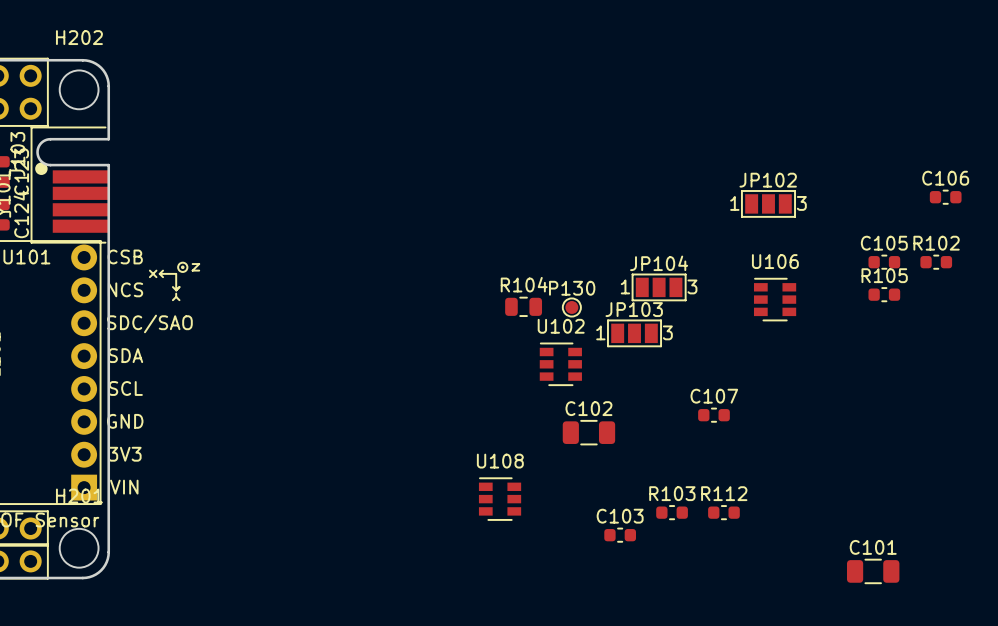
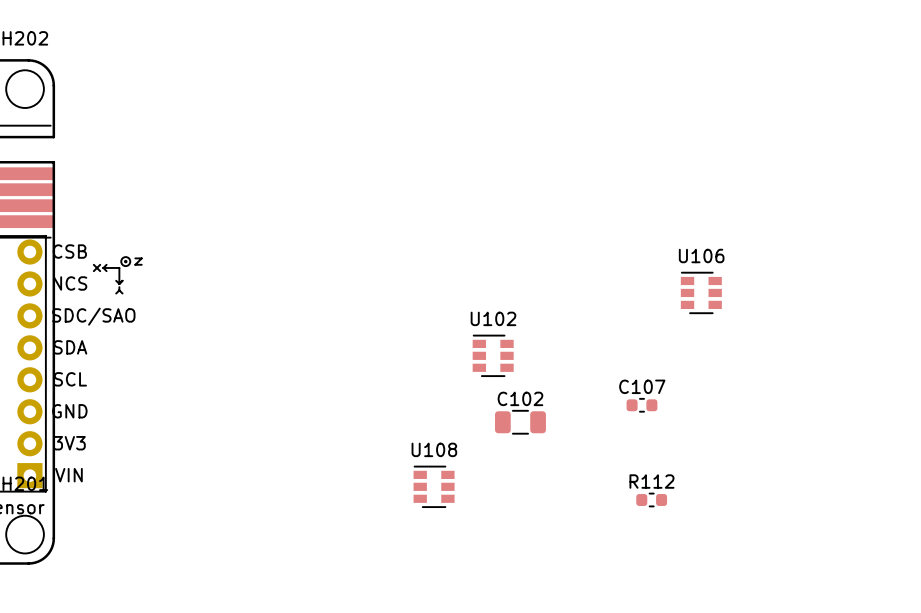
C106: (945, 197) -> none
JP102: (768, 203) -> none
C105: (884, 262) -> none
R102: (936, 262) -> none
JP104: (659, 287) -> none
R105: (884, 294) -> none
R104: (523, 306) -> none
P130: (571, 307) -> none
JP103: (634, 333) -> none
R103: (672, 512) -> none
C103: (620, 535) -> none
C101: (873, 571) -> none

